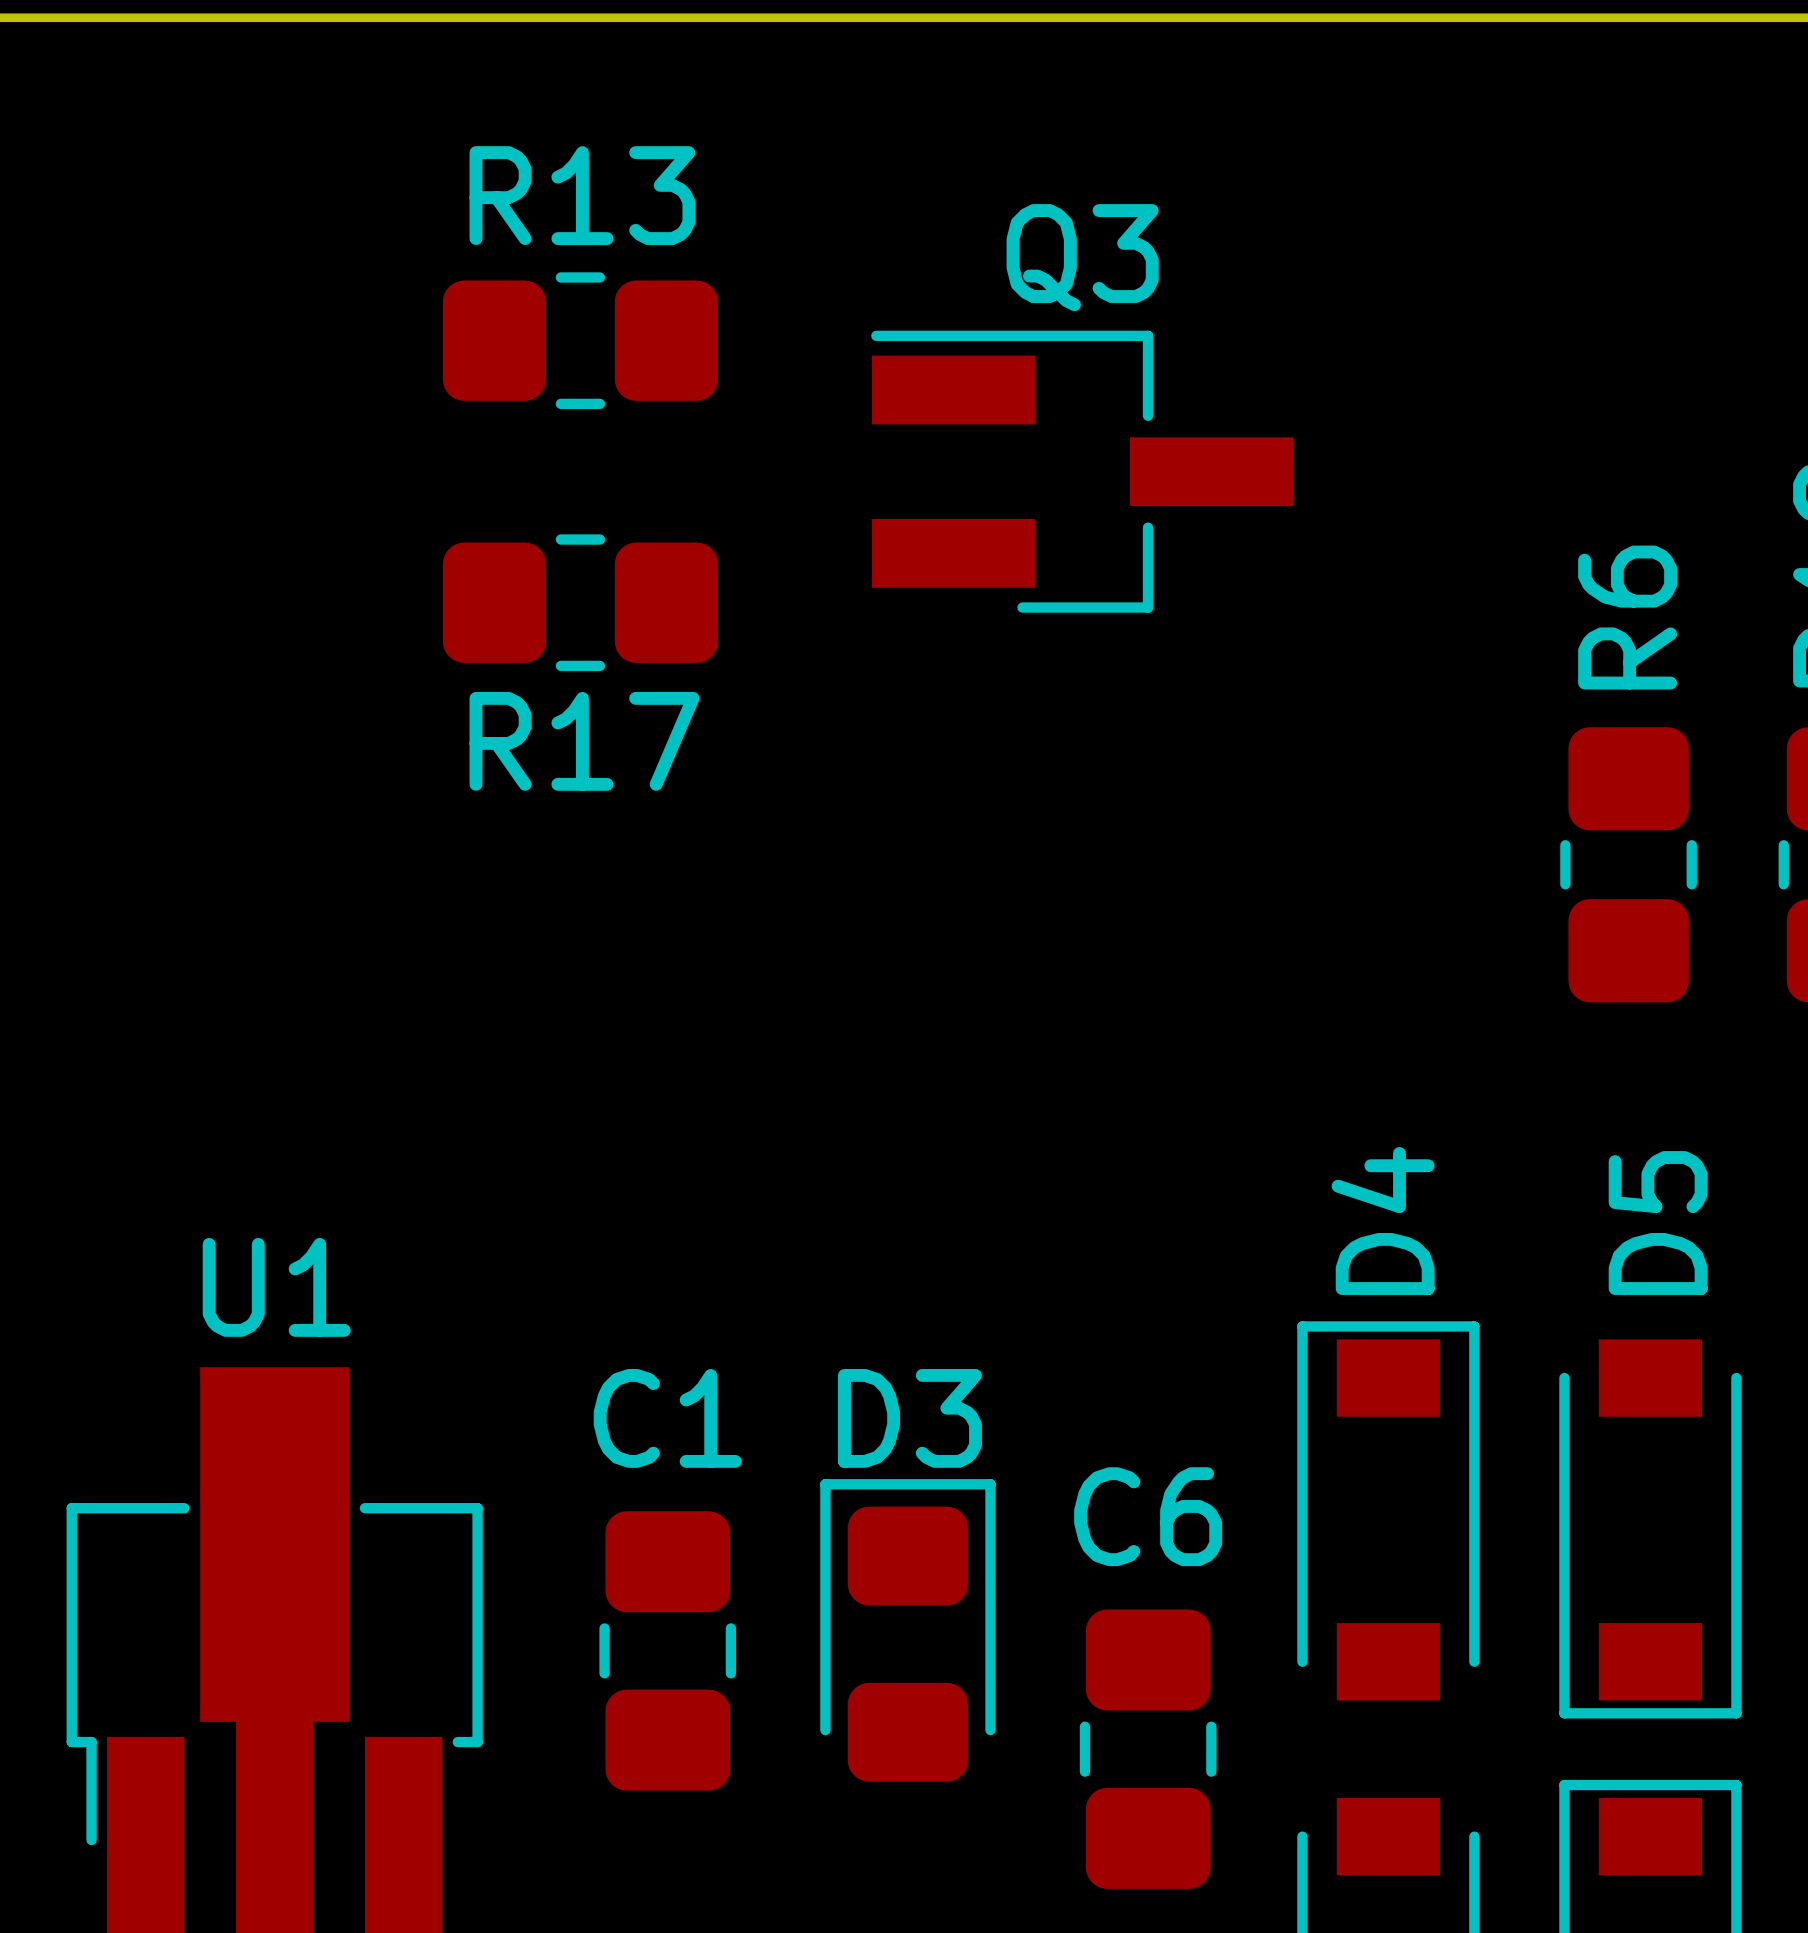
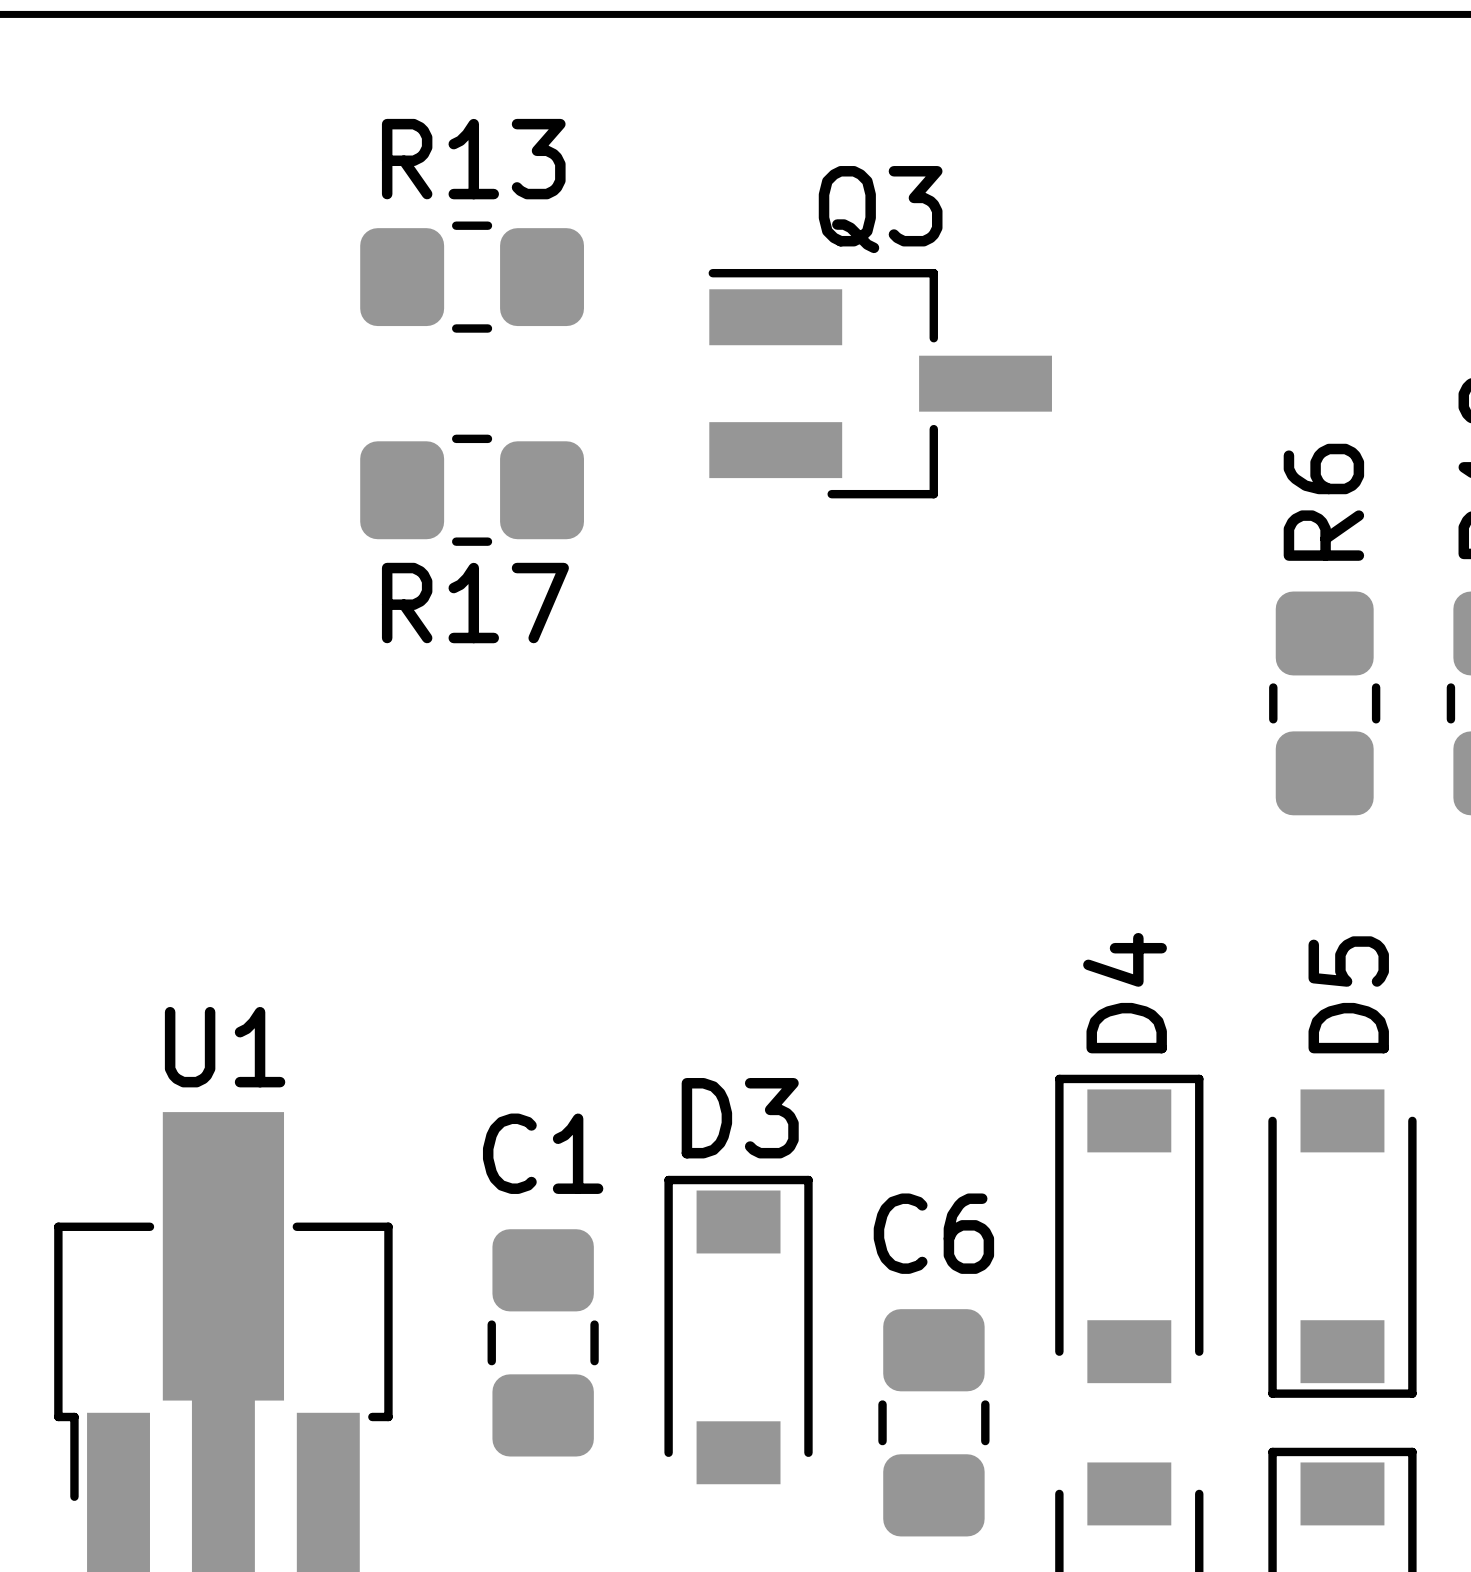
D3 name position: D3 (909, 1418) -> D3 (740, 1118)
D3 footprint: [820, 1479, 996, 1782] -> [664, 1175, 813, 1485]

